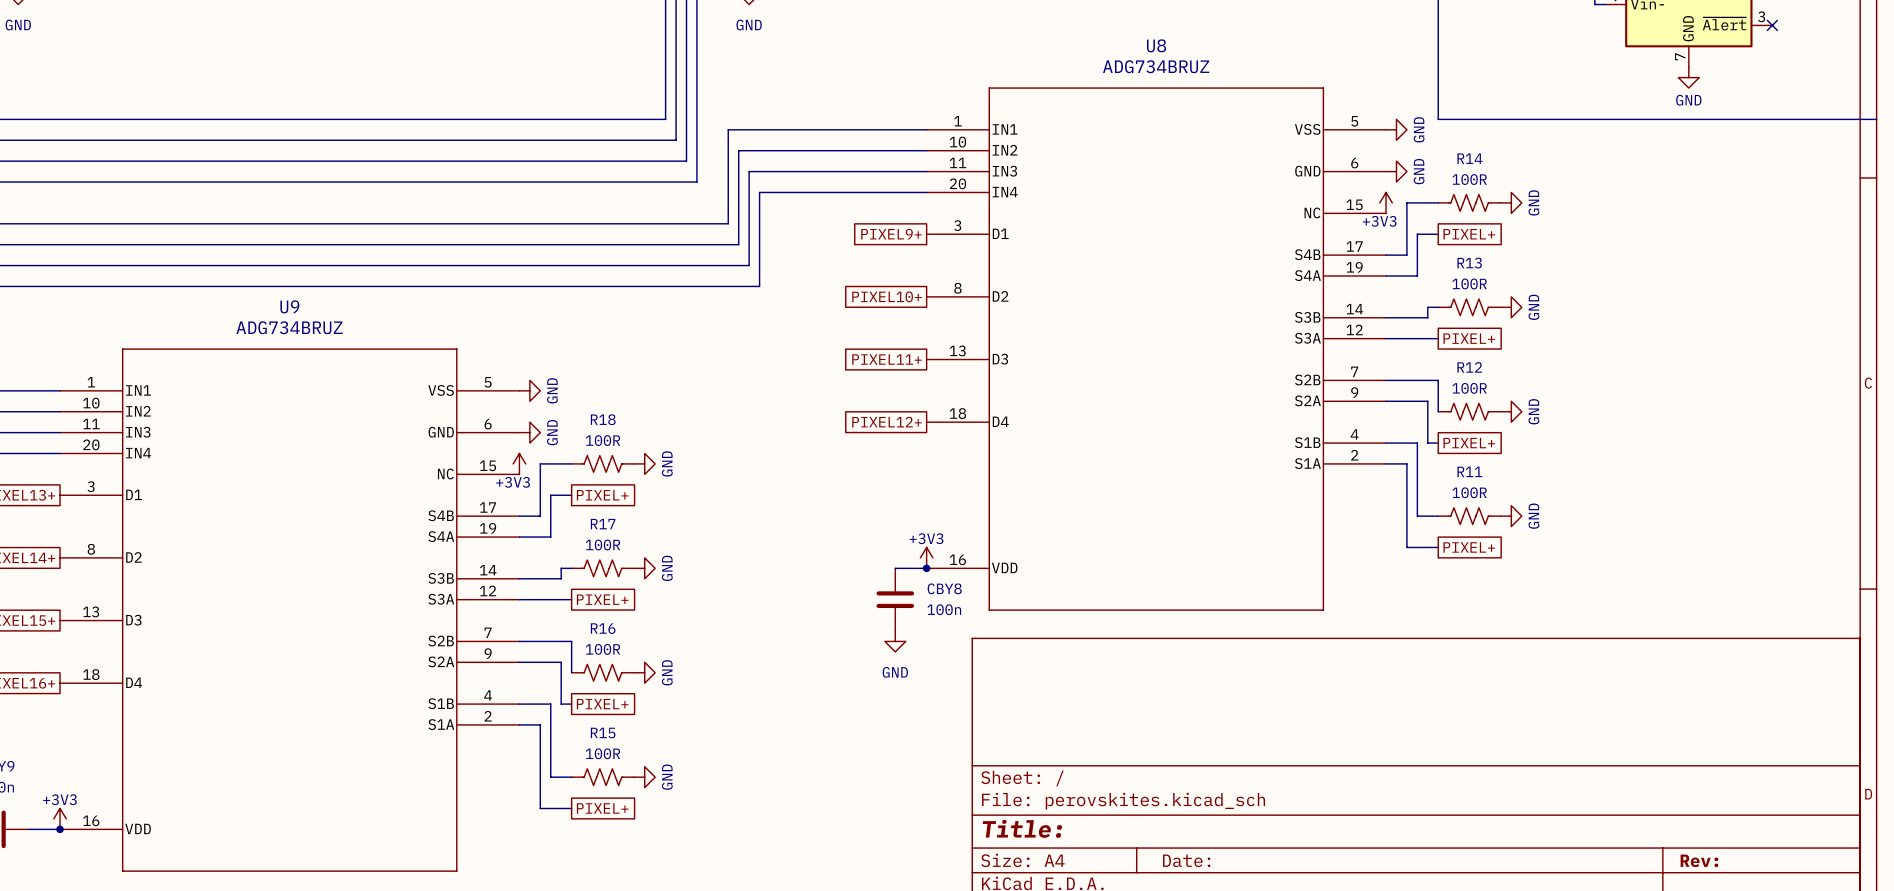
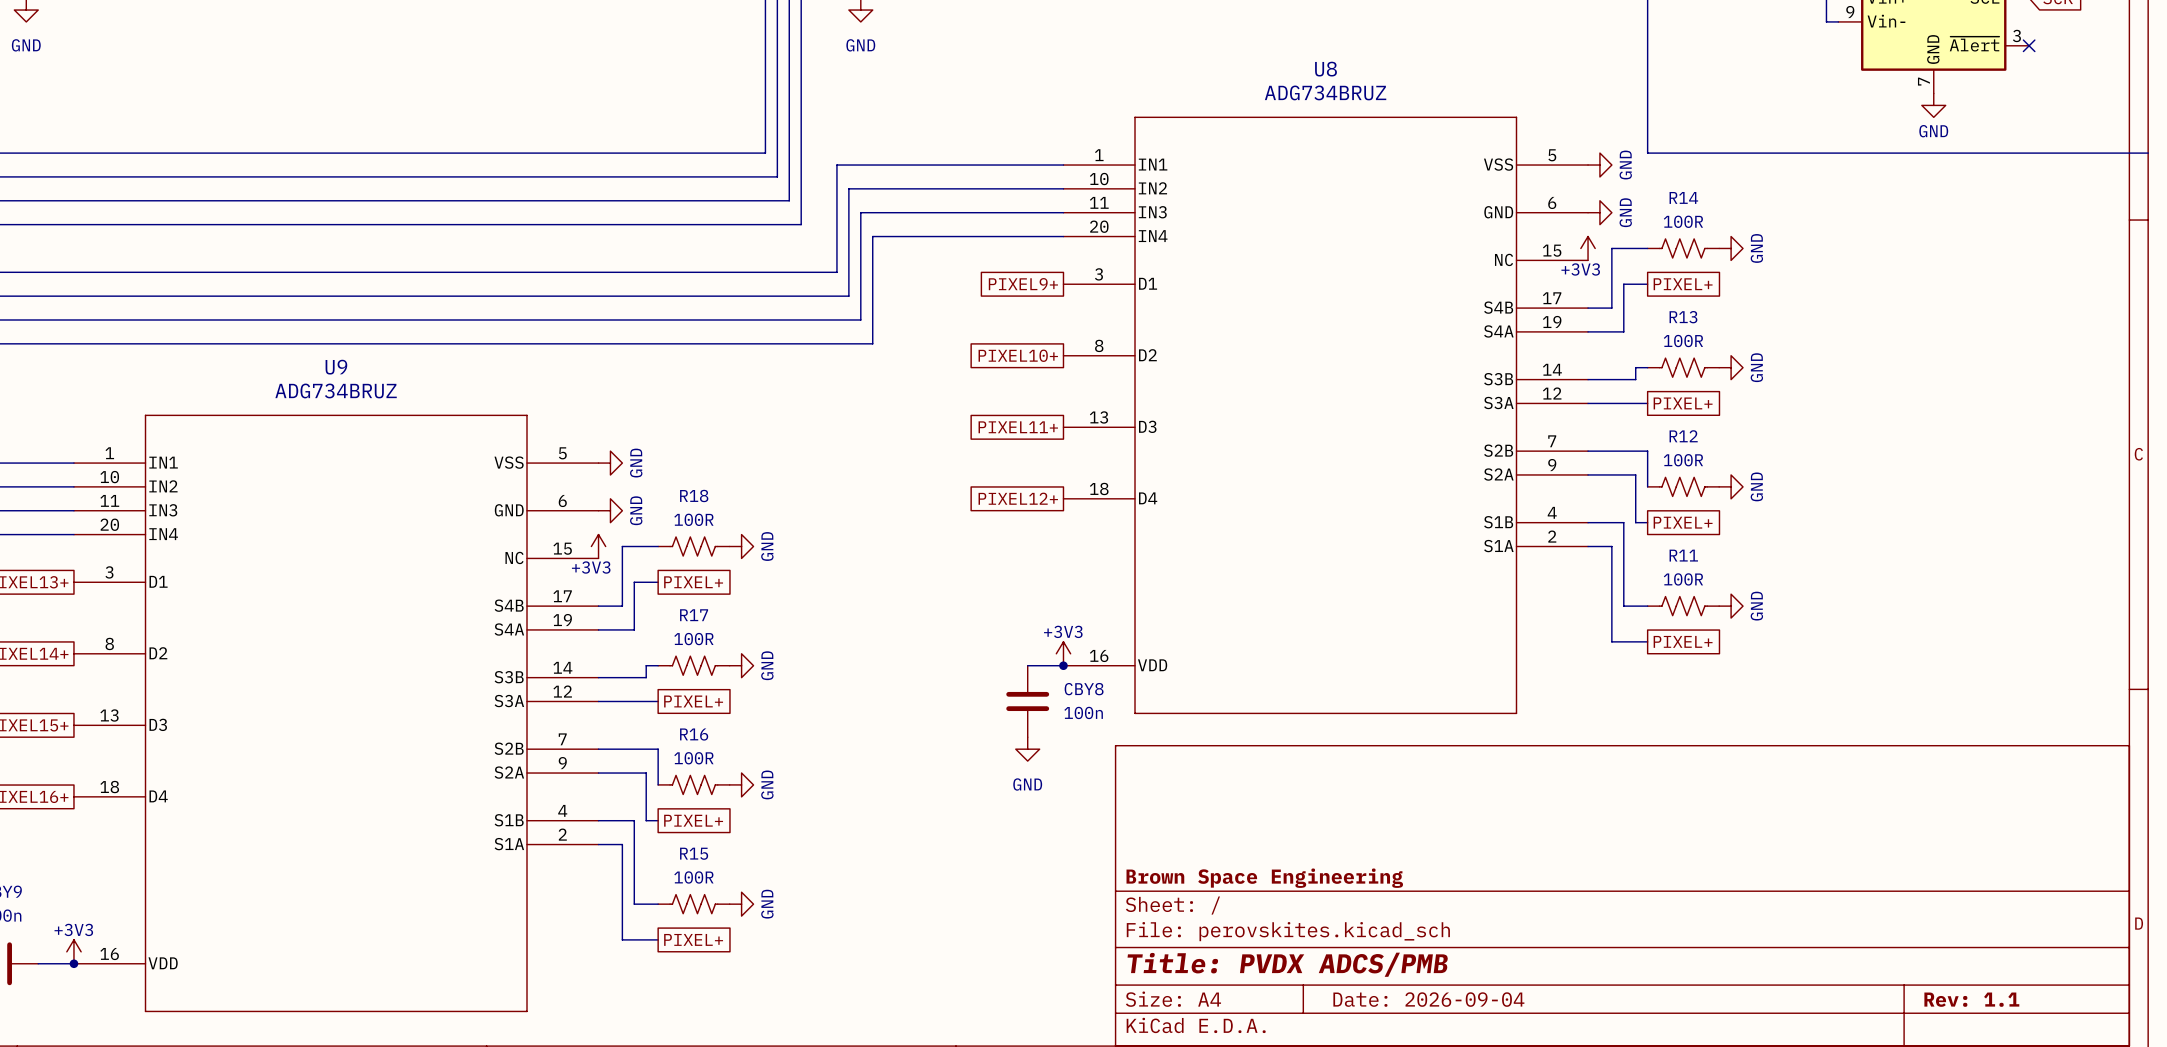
title block: none -> Brown Space Engineering (1264, 878)
title block: Title: (1022, 828) -> Title: PVDX ADCS/PMB (1287, 964)
title block: Date: (1186, 860) -> Date: 2026-09-04 (1428, 999)
title block: Rev: (1699, 860) -> Rev: 1.1 (1971, 999)

